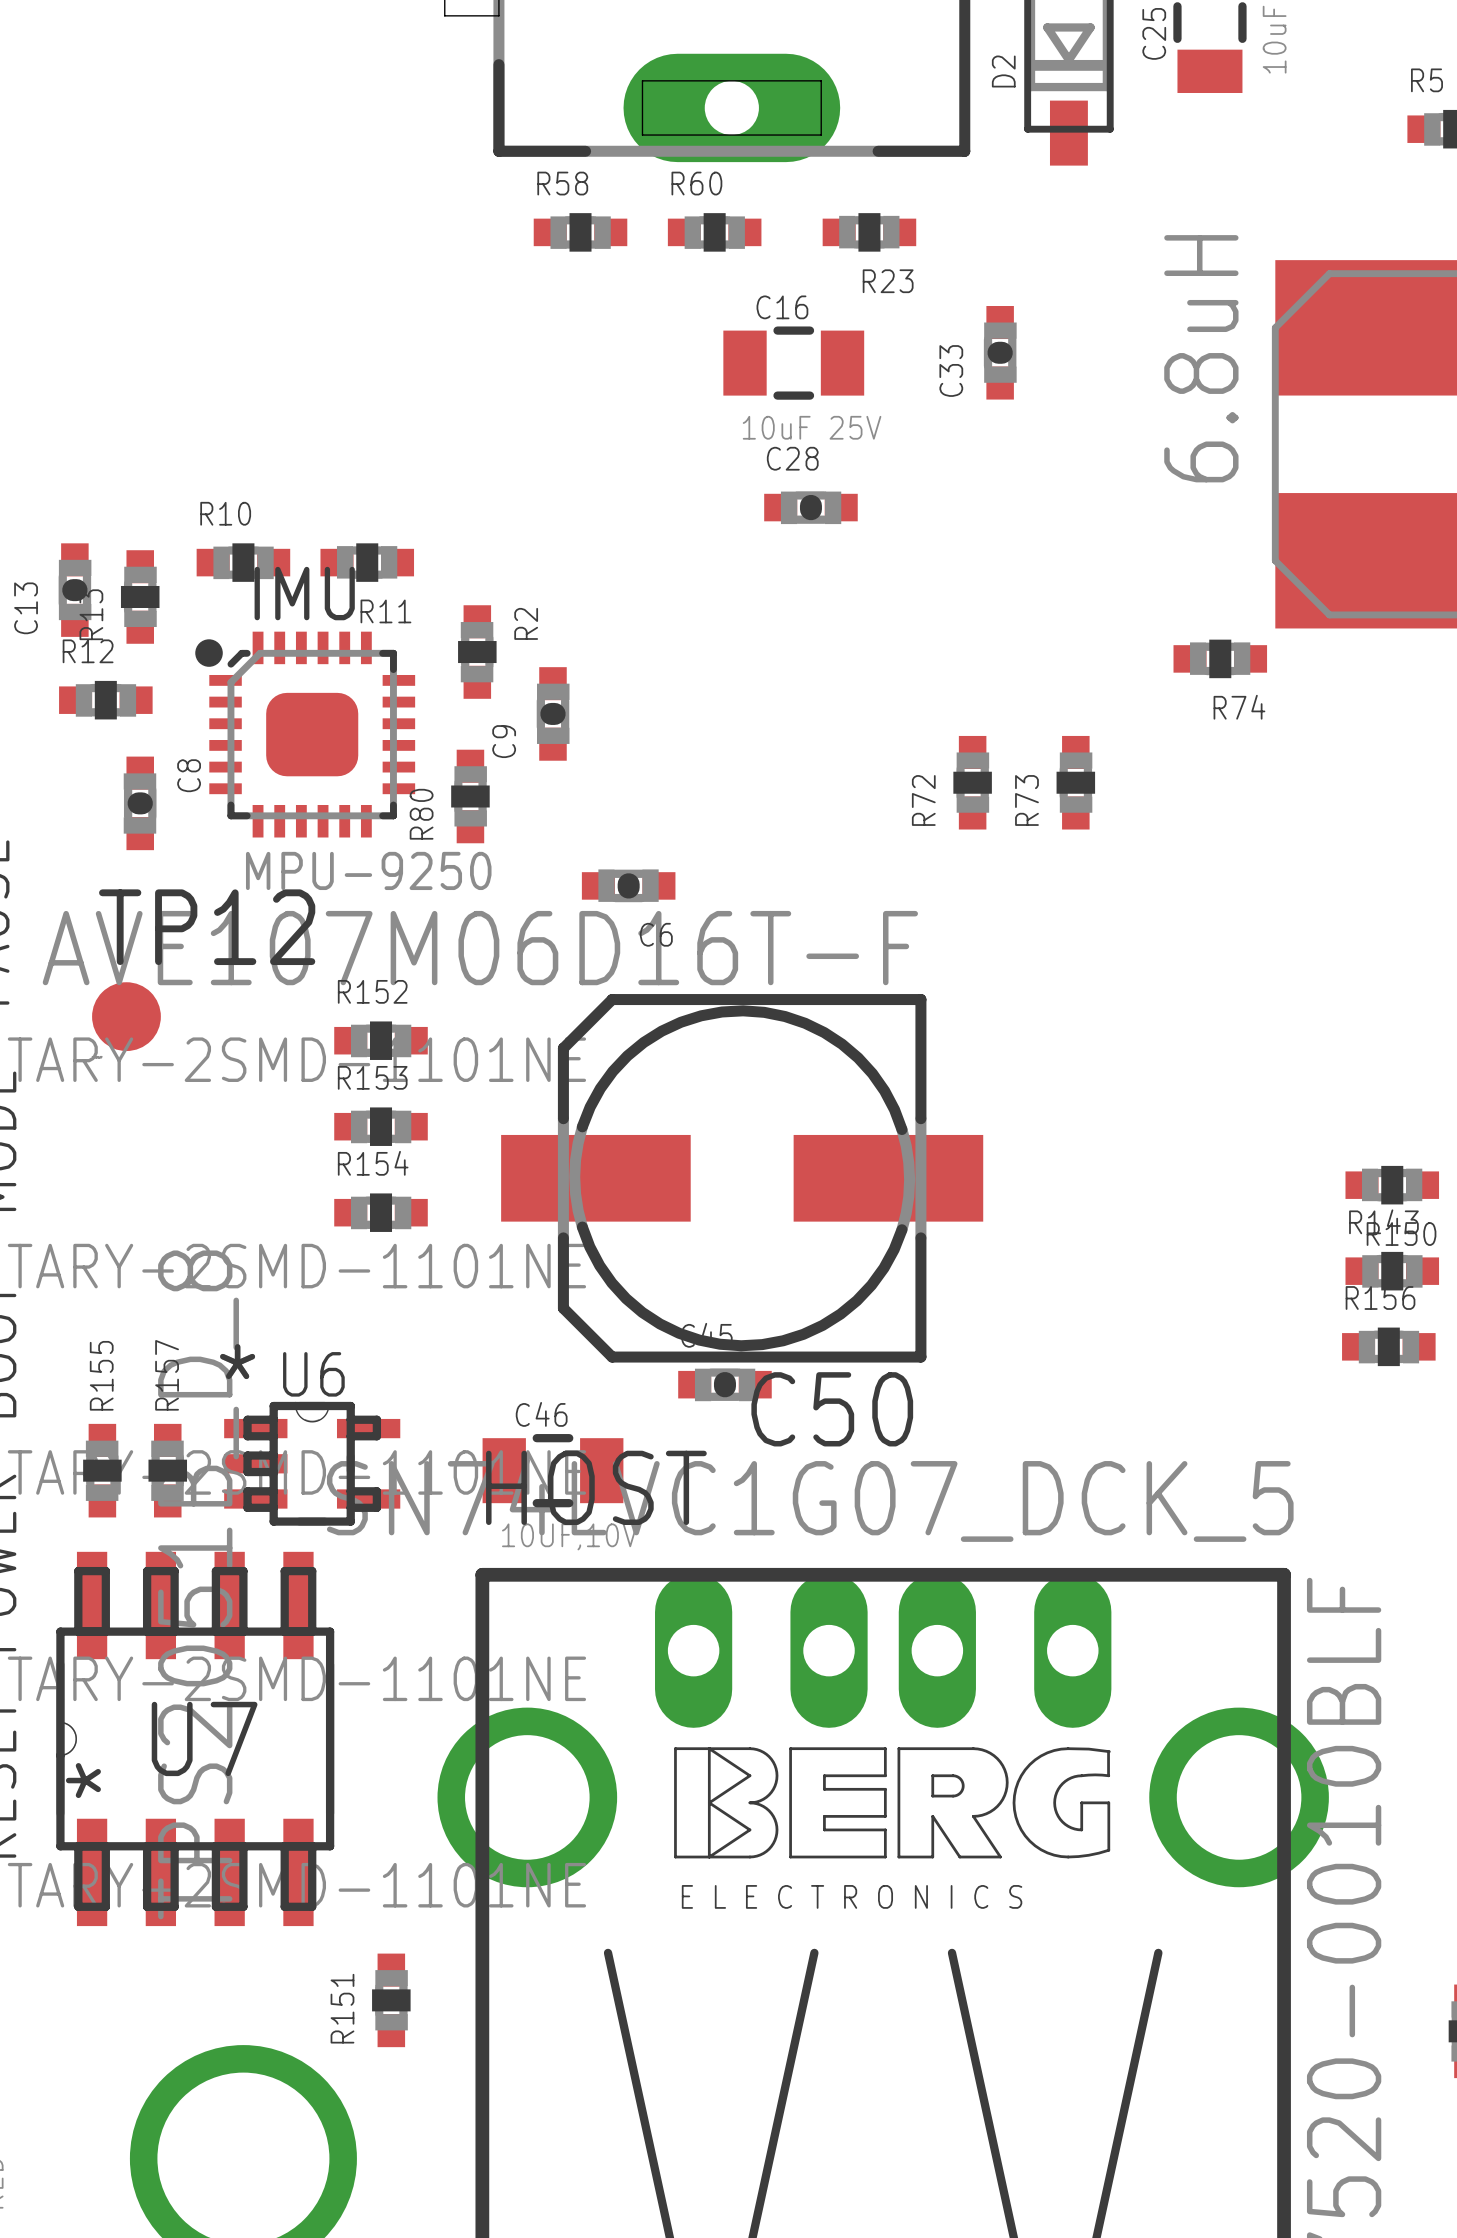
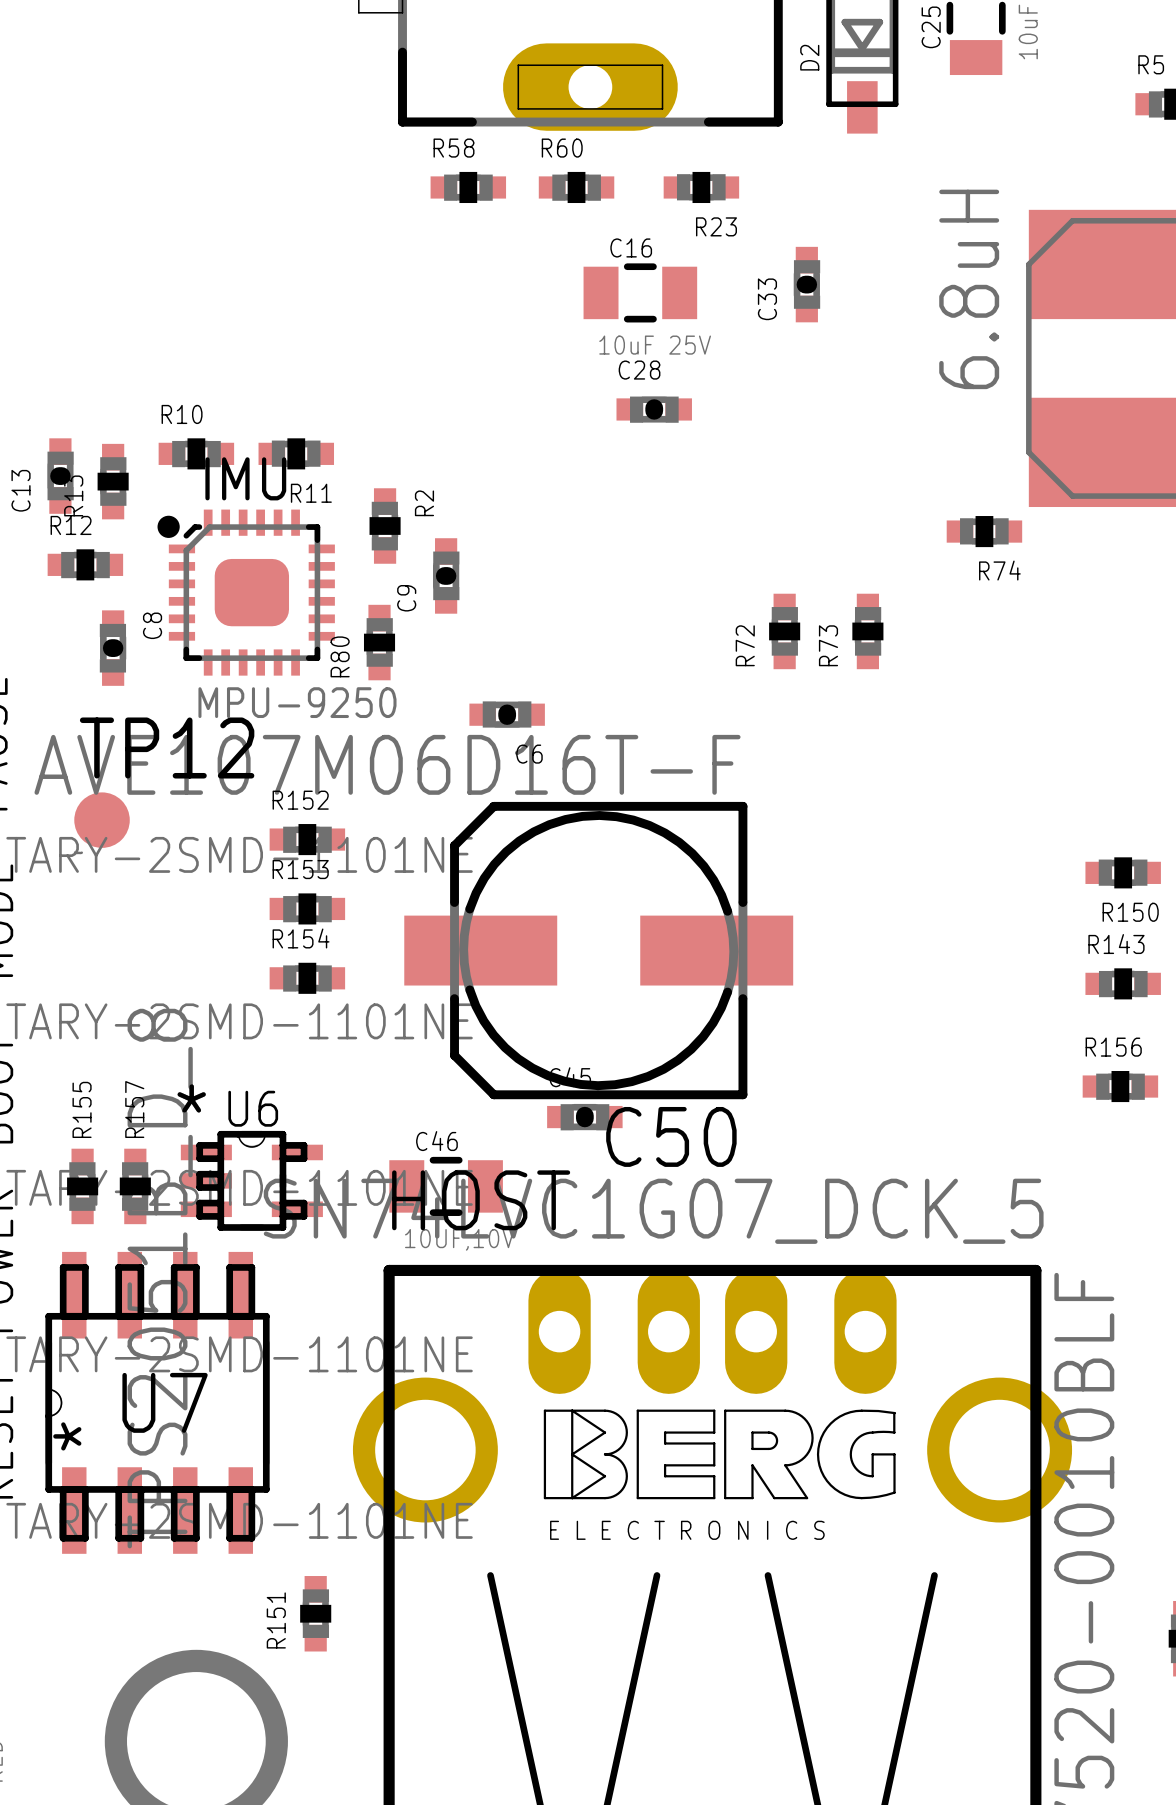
R150 position: (1392, 1185) -> (1123, 872)
R143 position: (1392, 1271) -> (1123, 983)

